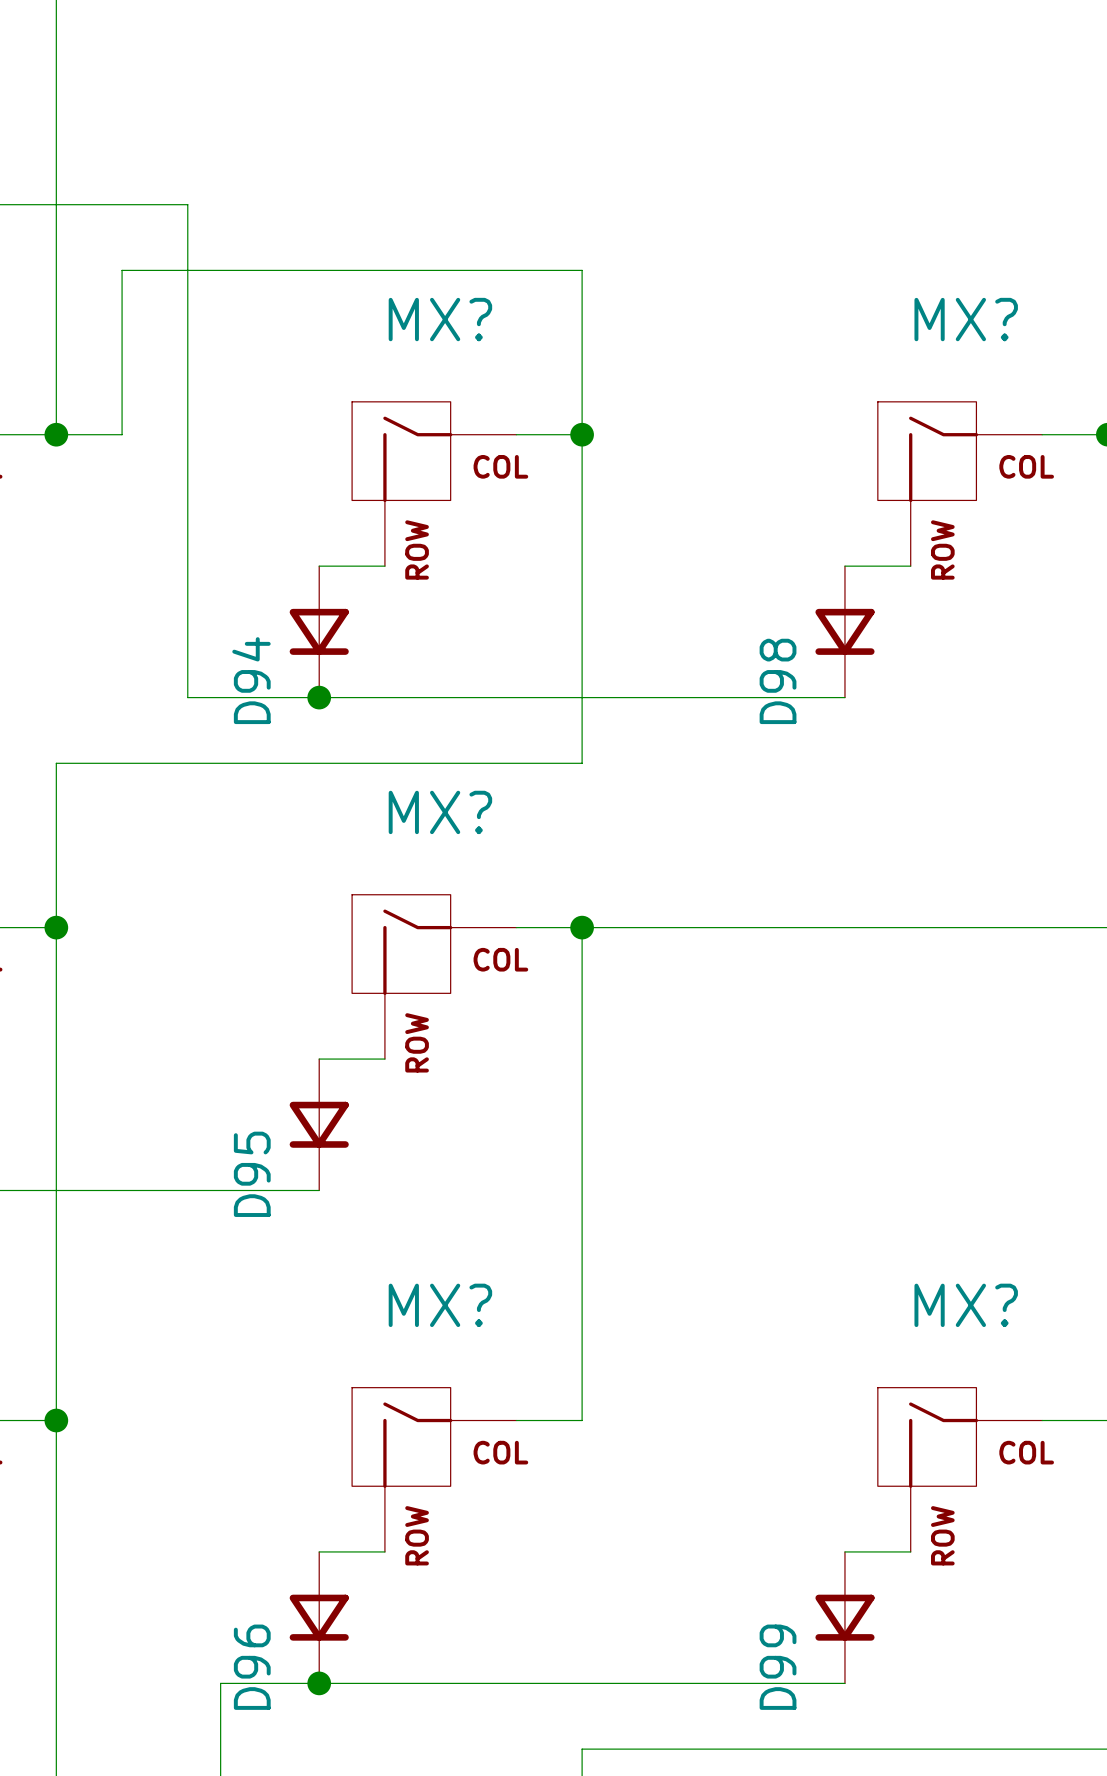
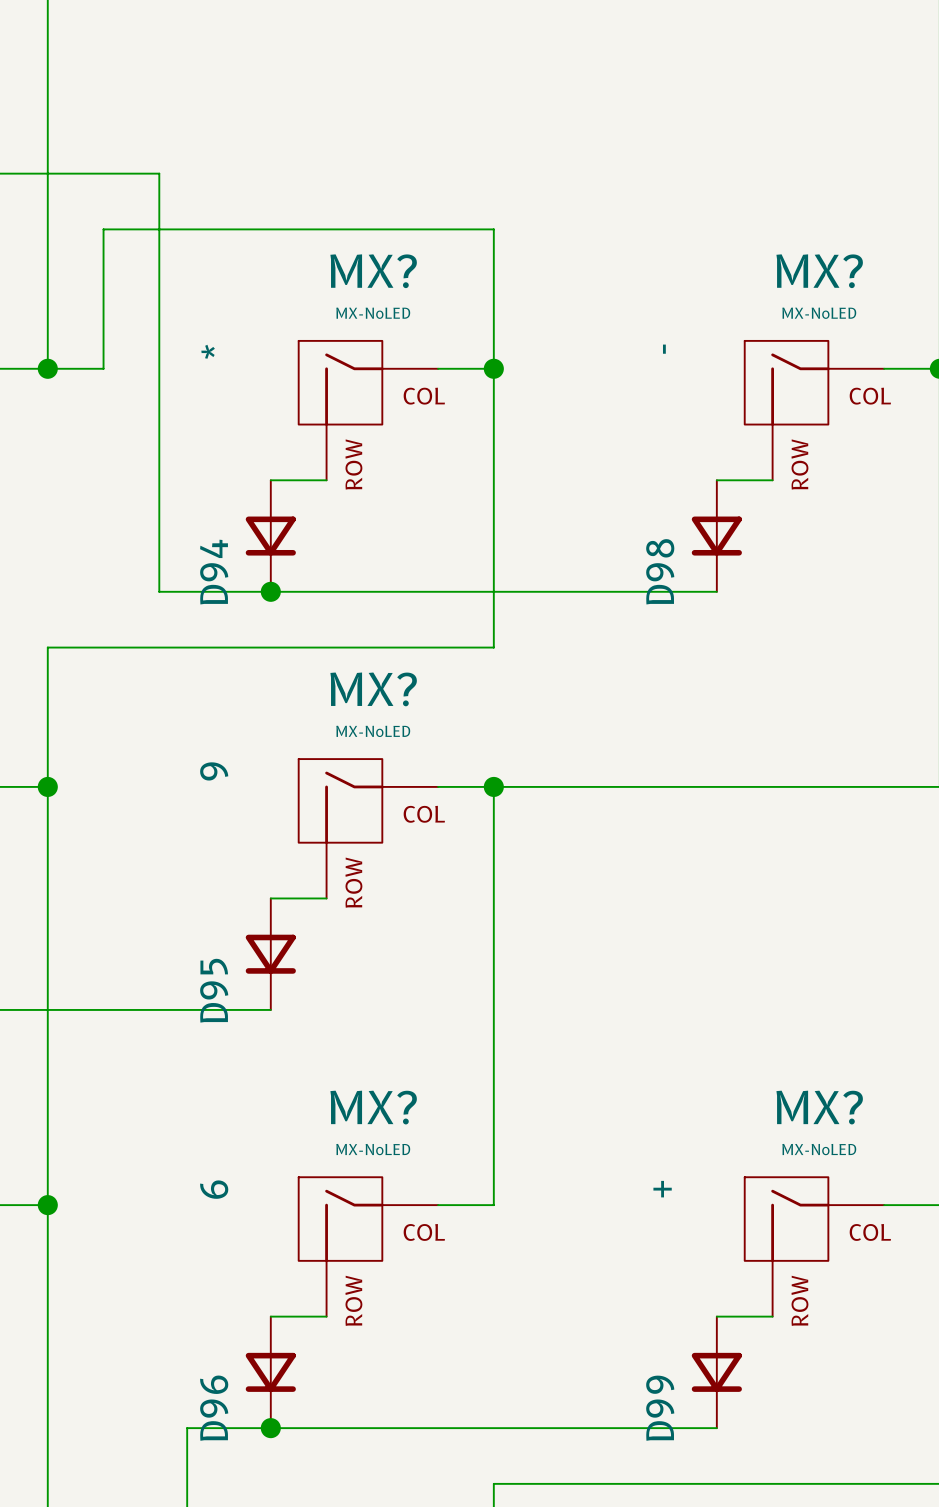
MX? value: none -> MX-NoLED (373, 313)
MX? value: none -> MX-NoLED (819, 313)
D94 value: none -> * (208, 351)
D98 value: none -> - (664, 349)
MX? value: none -> MX-NoLED (373, 731)
D95 value: none -> 9 (214, 771)
MX? value: none -> MX-NoLED (373, 1149)
MX? value: none -> MX-NoLED (819, 1149)
D96 value: none -> 6 (214, 1189)
D99 value: none -> + (662, 1189)

